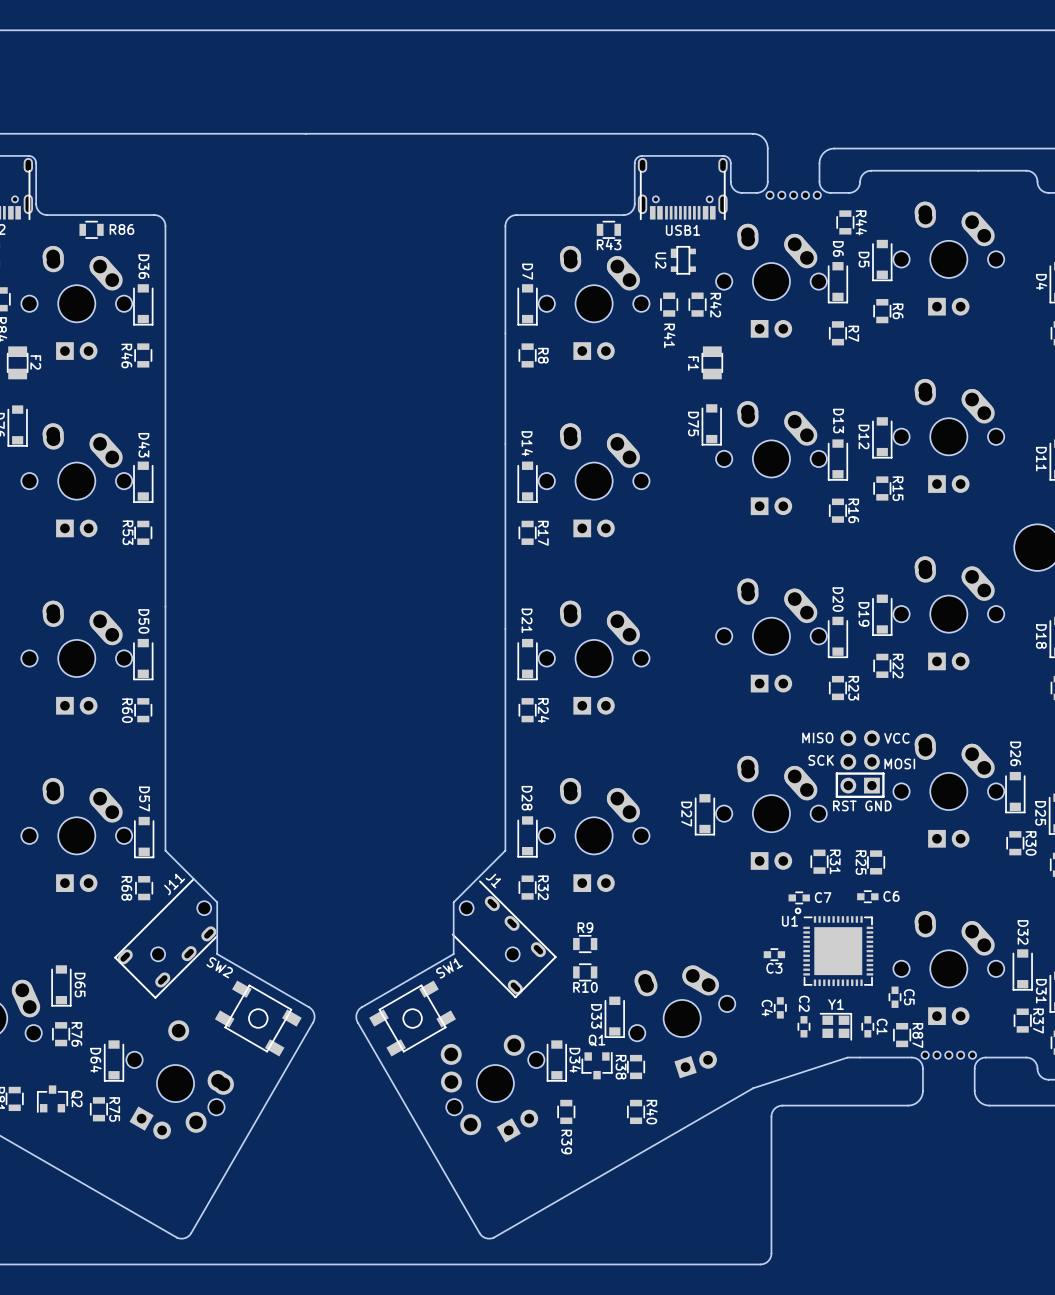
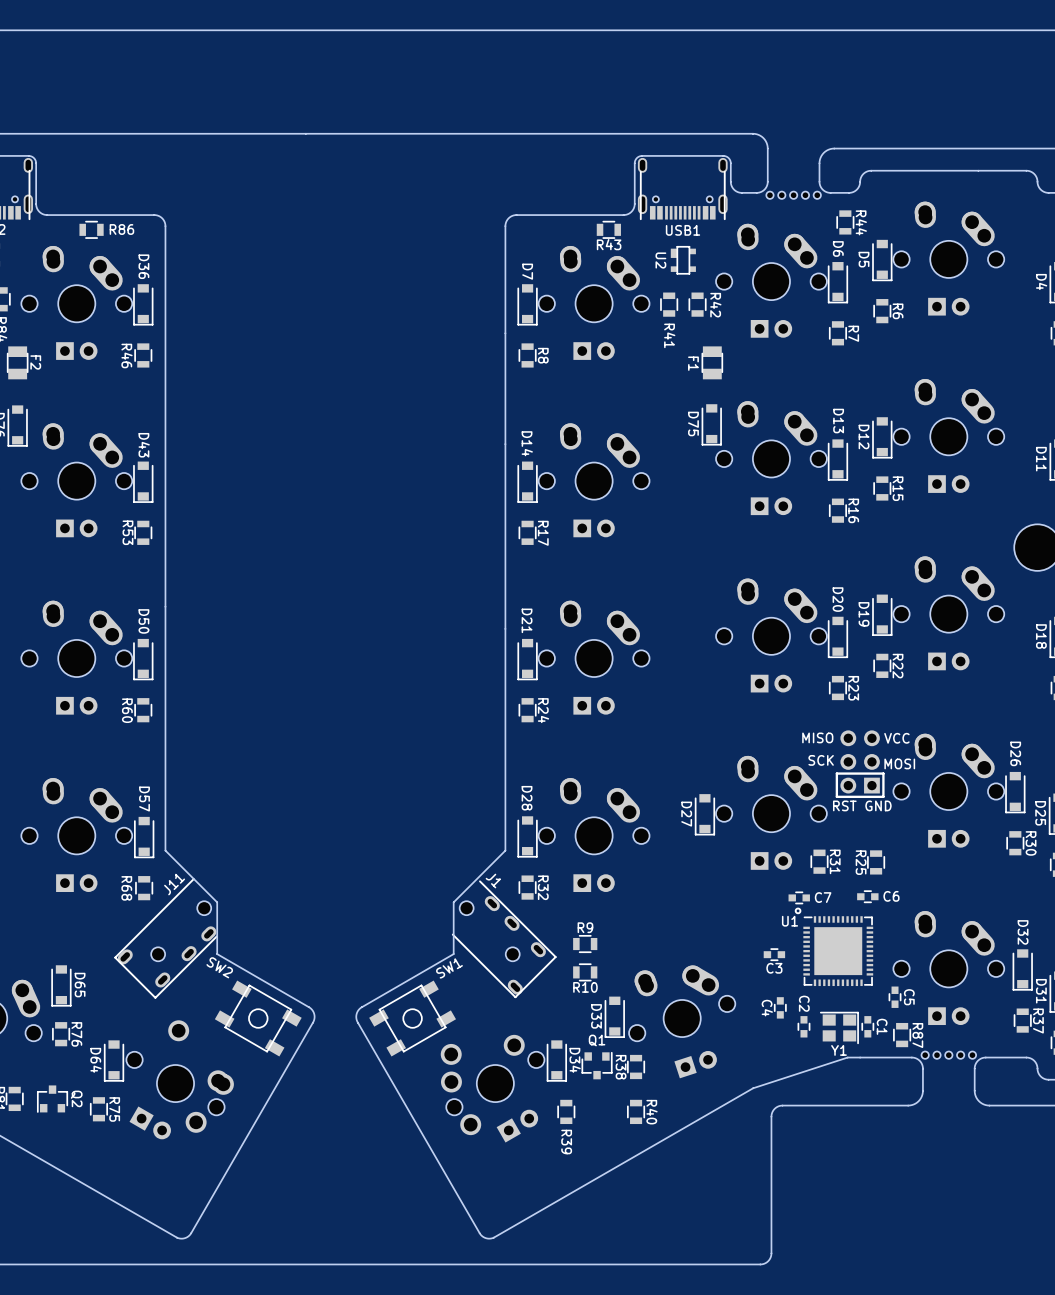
Y1 name position: Y1 (836, 1004) -> Y1 (839, 1050)
Y1 footprint: [819, 1013, 852, 1041] -> [820, 1012, 859, 1044]

